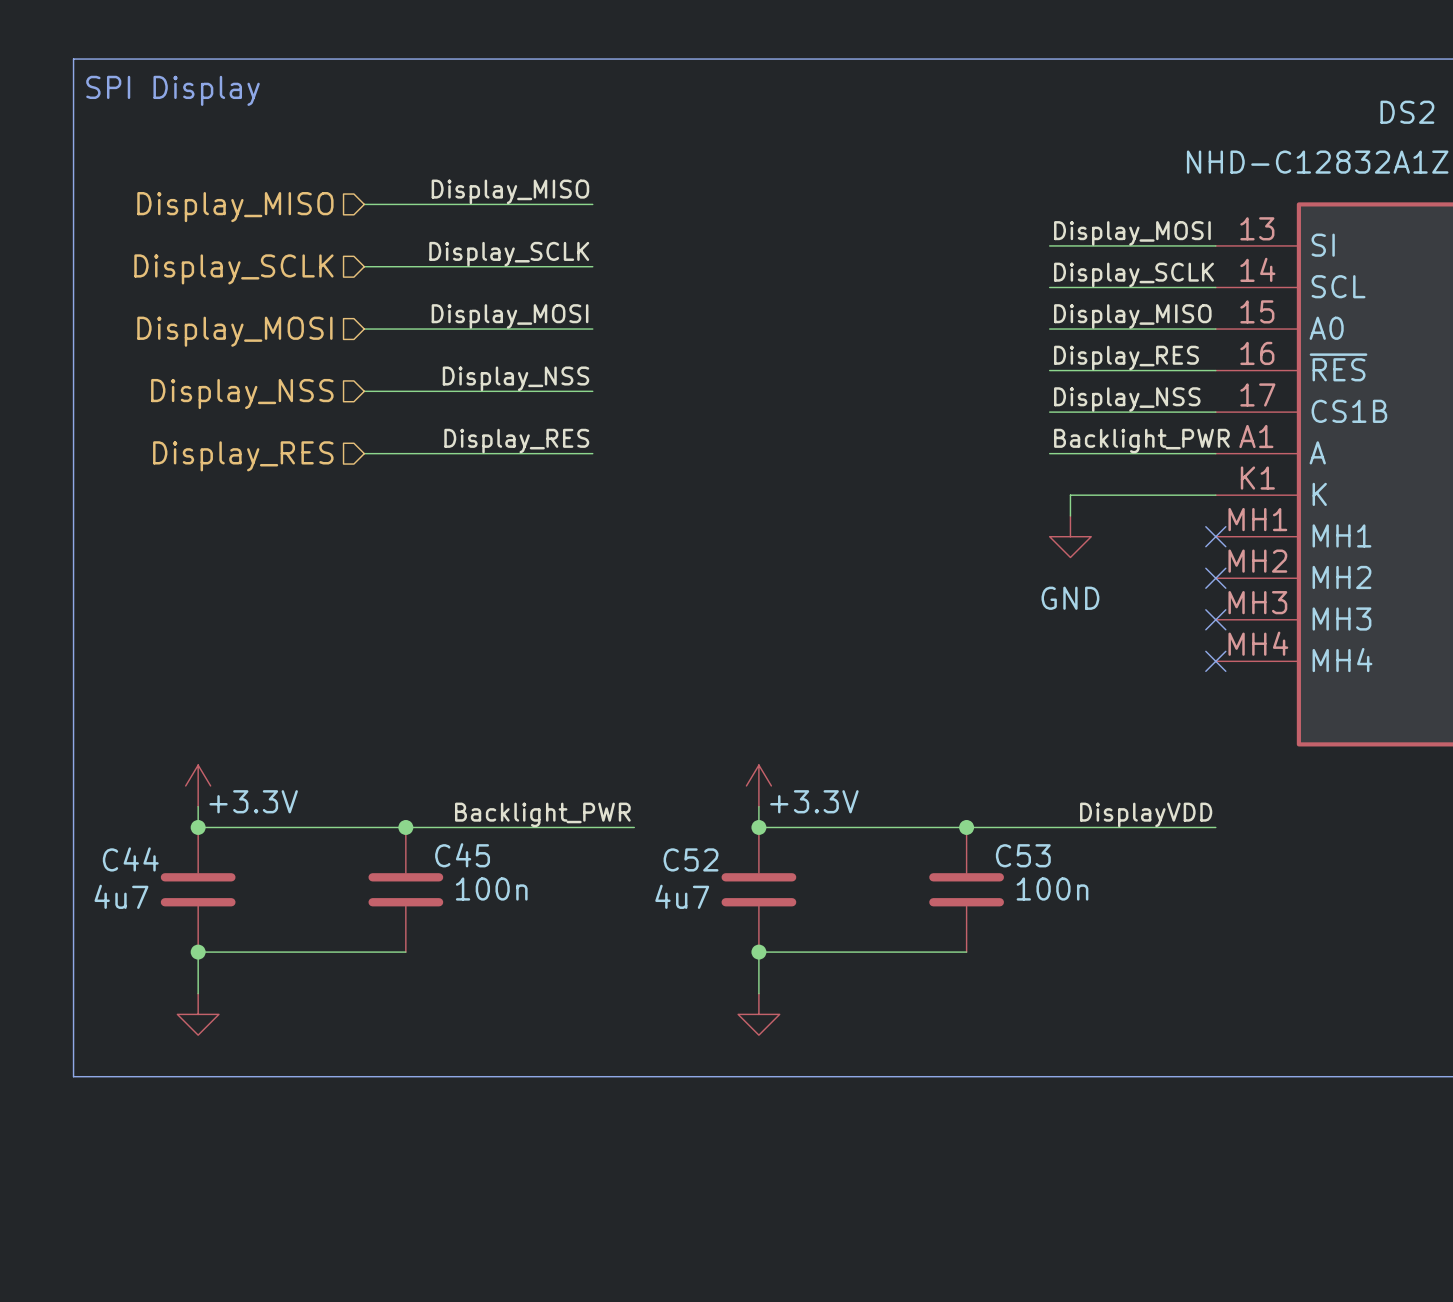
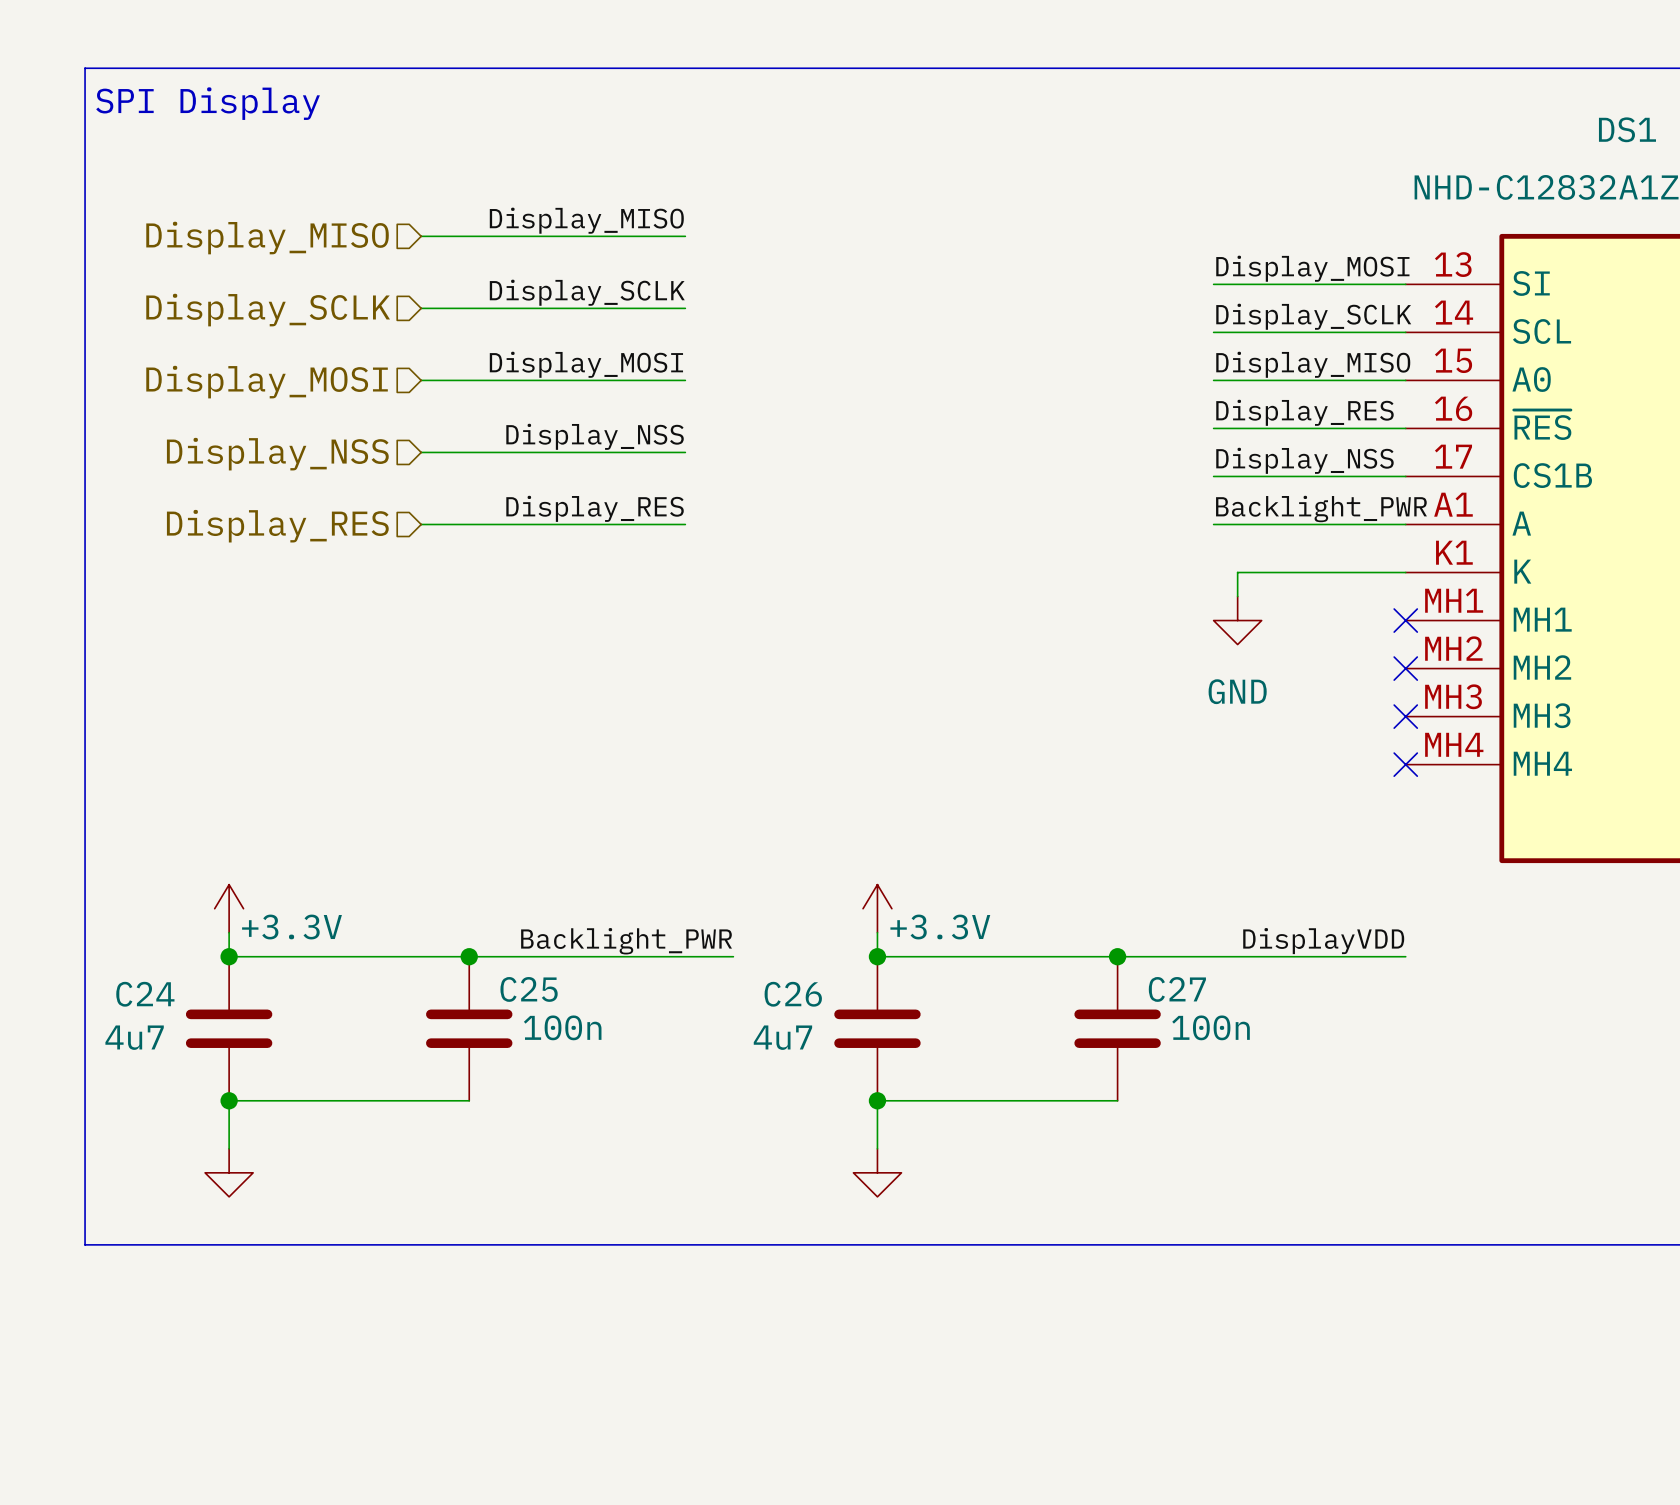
DS2 name: DS2 (1407, 112) -> DS1 (1627, 129)
C45 name: C45 (462, 855) -> C25 (529, 989)
C53 name: C53 (1023, 855) -> C27 (1177, 989)
C44 name: C44 (130, 859) -> C24 (145, 994)
C52 name: C52 (691, 859) -> C26 (793, 994)

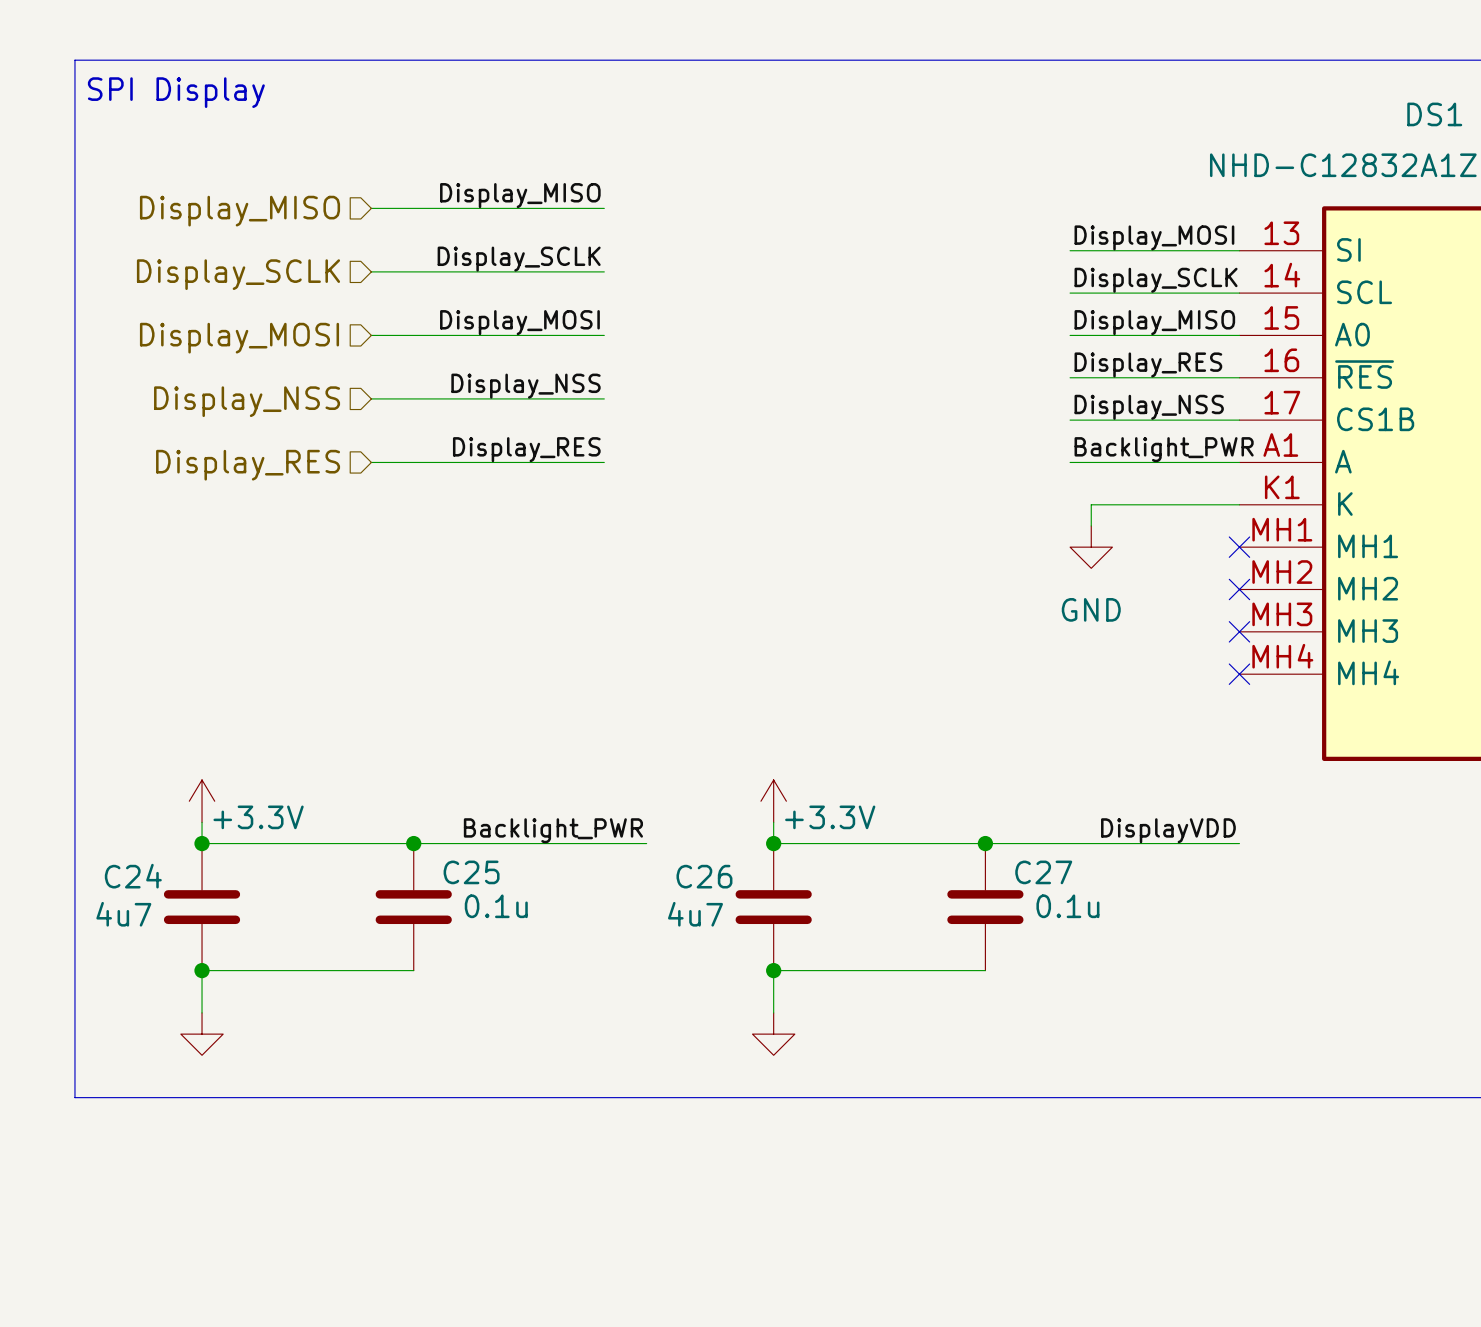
C25 value: 100n (562, 1027) -> 0.1u (496, 906)
C27 value: 100n (1211, 1027) -> 0.1u (1067, 906)

